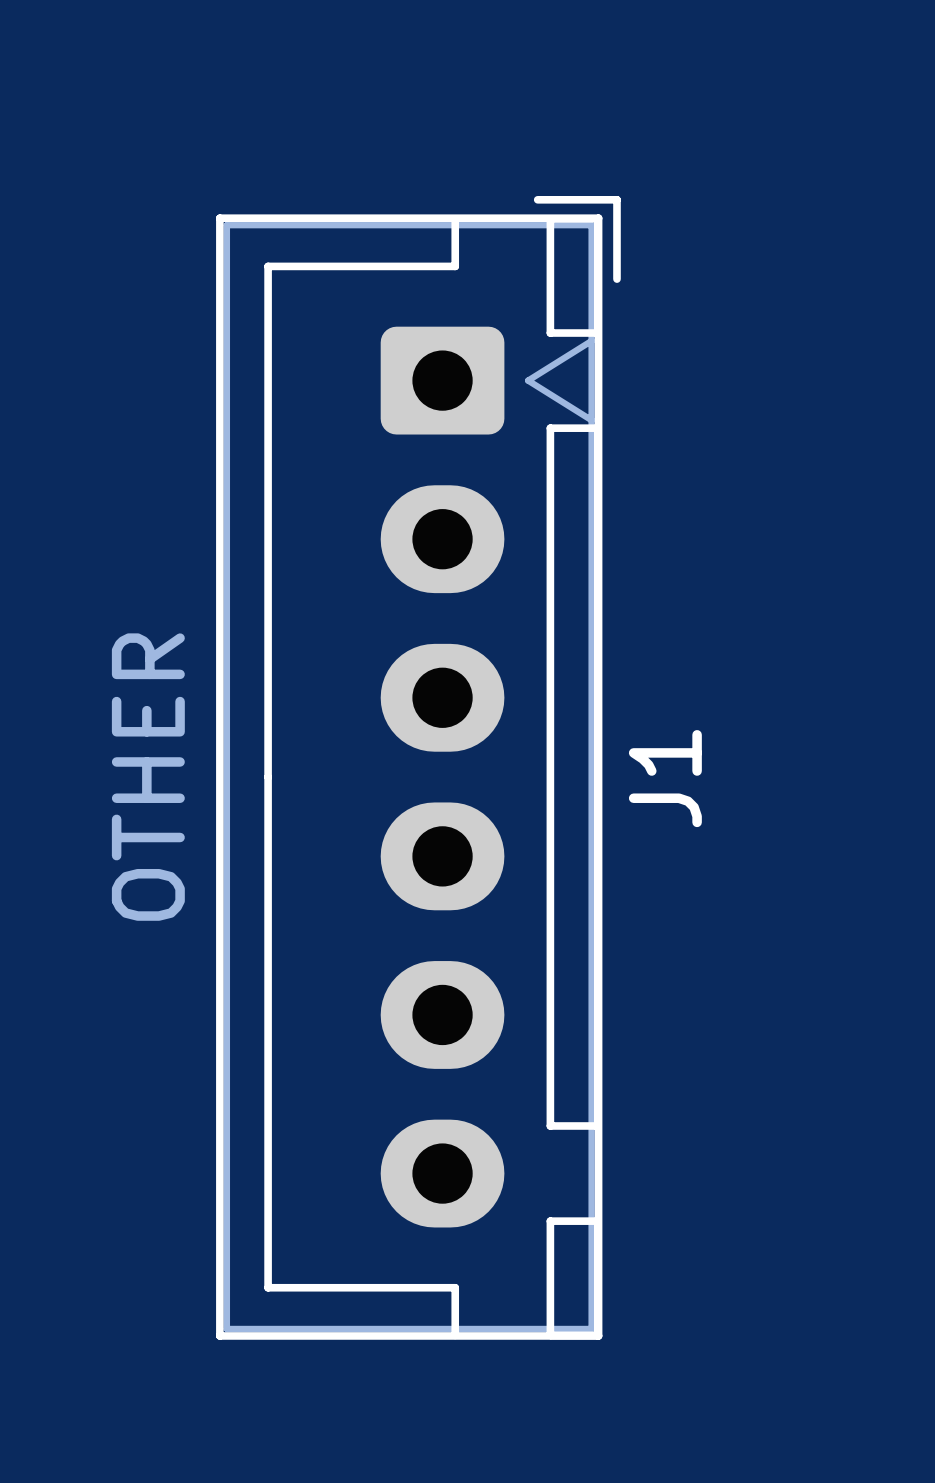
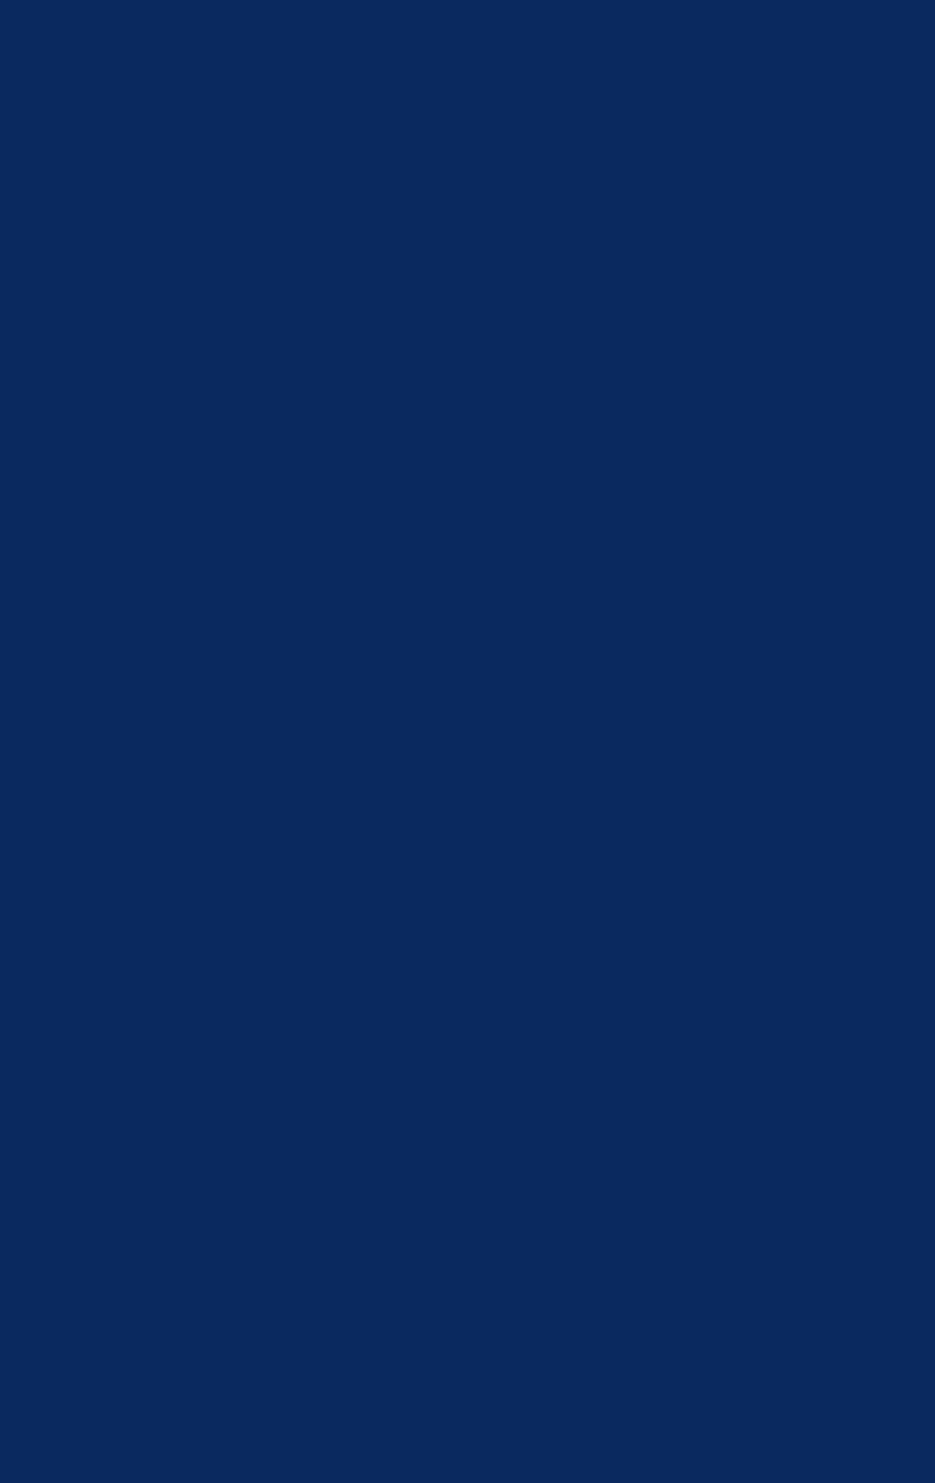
J1: OTHER (418, 767) -> none

